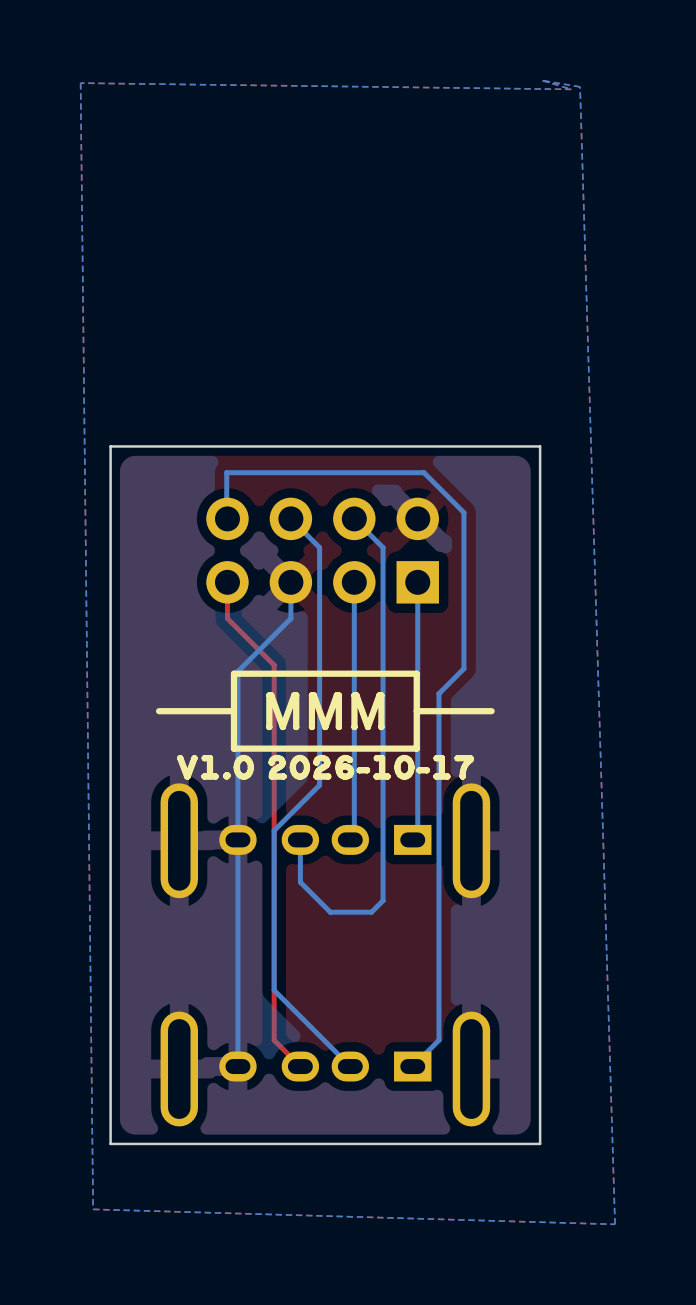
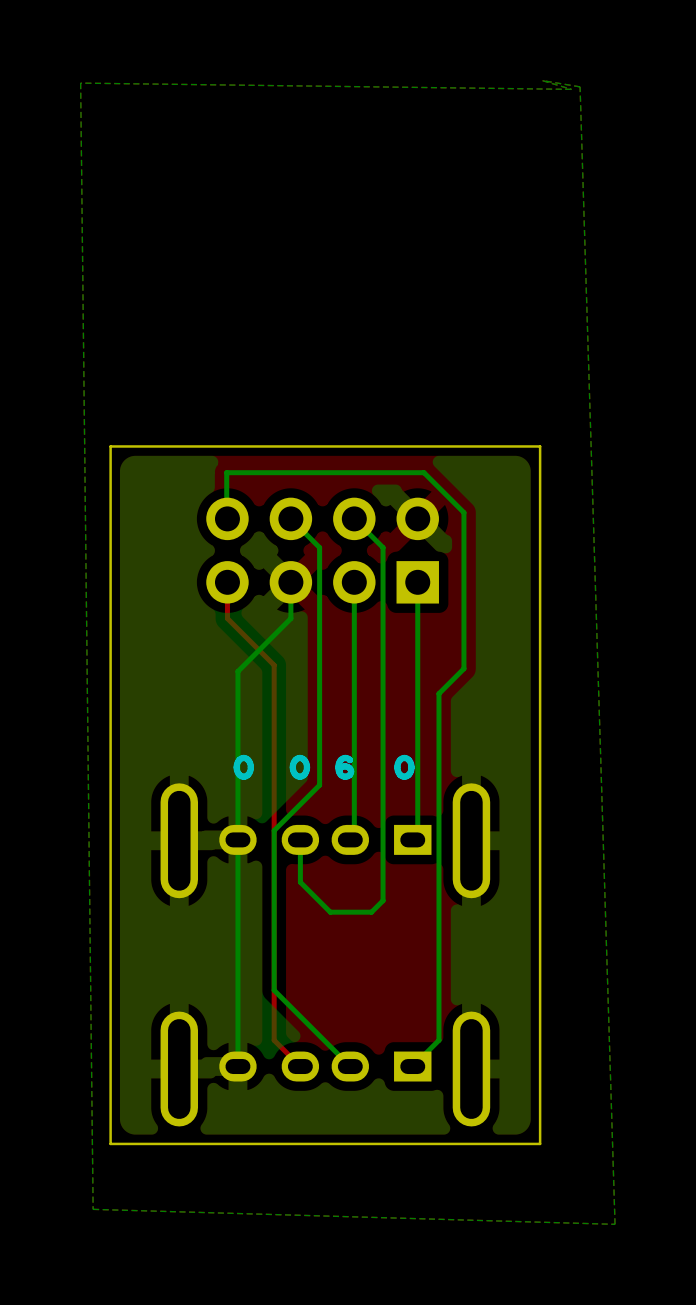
line: (416, 673) (233, 673) (233, 748) (416, 748) (416, 673) -> none
line: (296, 694) (293, 695) (282, 725) (271, 695) (269, 695) (269, 727) (269, 695) (282, 727) (295, 695) (296, 727) (296, 694) -> none
line: (338, 694) (336, 695) (325, 725) (314, 695) (311, 695) (311, 727) (312, 695) (325, 727) (338, 695) (339, 727) (338, 694) -> none
line: (381, 694) (379, 695) (367, 725) (356, 695) (354, 695) (354, 727) (354, 695) (367, 727) (380, 695) (381, 727) (381, 694) -> none
line: (233, 711) (159, 711) -> none
line: (491, 711) (416, 711) -> none
line: (209, 757) (204, 758) (209, 758) (209, 776) (204, 776) (215, 776) (210, 776) (209, 757) -> none
line: (277, 757) (279, 758) (281, 759) (282, 761) (282, 763) (281, 765) (273, 771) (272, 776) (283, 776) (271, 776) (273, 771) (282, 763) (281, 760) (277, 758) (273, 759) (271, 762) (272, 759) (277, 757) -> none
line: (321, 757) (324, 758) (326, 759) (327, 761) (327, 763) (326, 765) (318, 771) (316, 776) (328, 776) (316, 776) (317, 771) (327, 763) (326, 760) (322, 758) (318, 759) (316, 762) (317, 759) (321, 757) -> none
line: (382, 757) (376, 758) (381, 758) (381, 776) (376, 776) (387, 776) (382, 776) (382, 757) -> none
line: (470, 757) (457, 758) (470, 758) (463, 767) (462, 771) (462, 776) (464, 767) (470, 759) (470, 757) -> none
line: (367, 770) (359, 770) (359, 770) (367, 770) (367, 770) -> none
line: (426, 770) (419, 770) (419, 770) (426, 770) (426, 770) -> none
line: (227, 774) (227, 776) (226, 776) (226, 775) (227, 774) -> none
line: (187, 776) (194, 758) (187, 776) -> none
line: (187, 776) (180, 758) (187, 776) -> none
line: (447, 776) (436, 776) (441, 776) (441, 758) (436, 758) (442, 758) (442, 776) (447, 776) -> none

